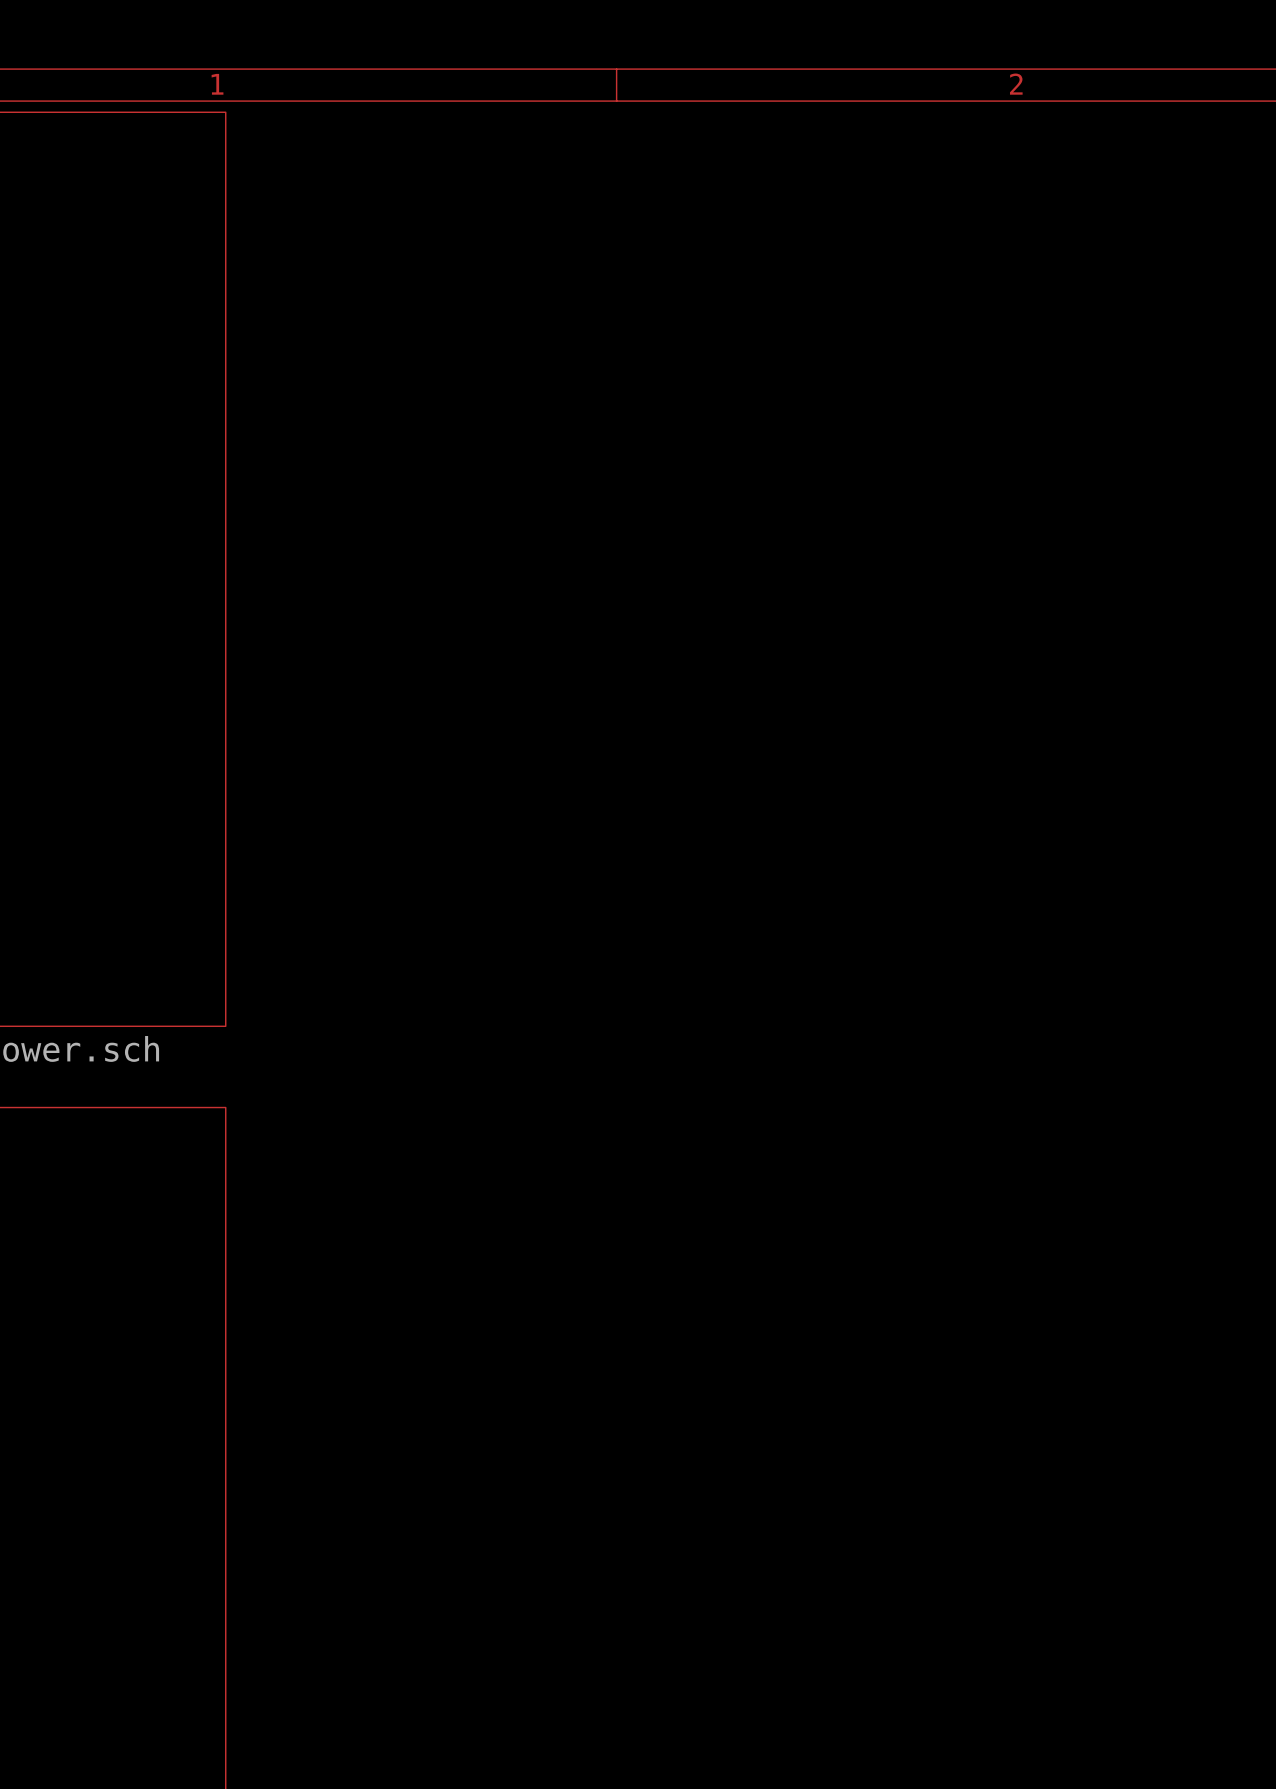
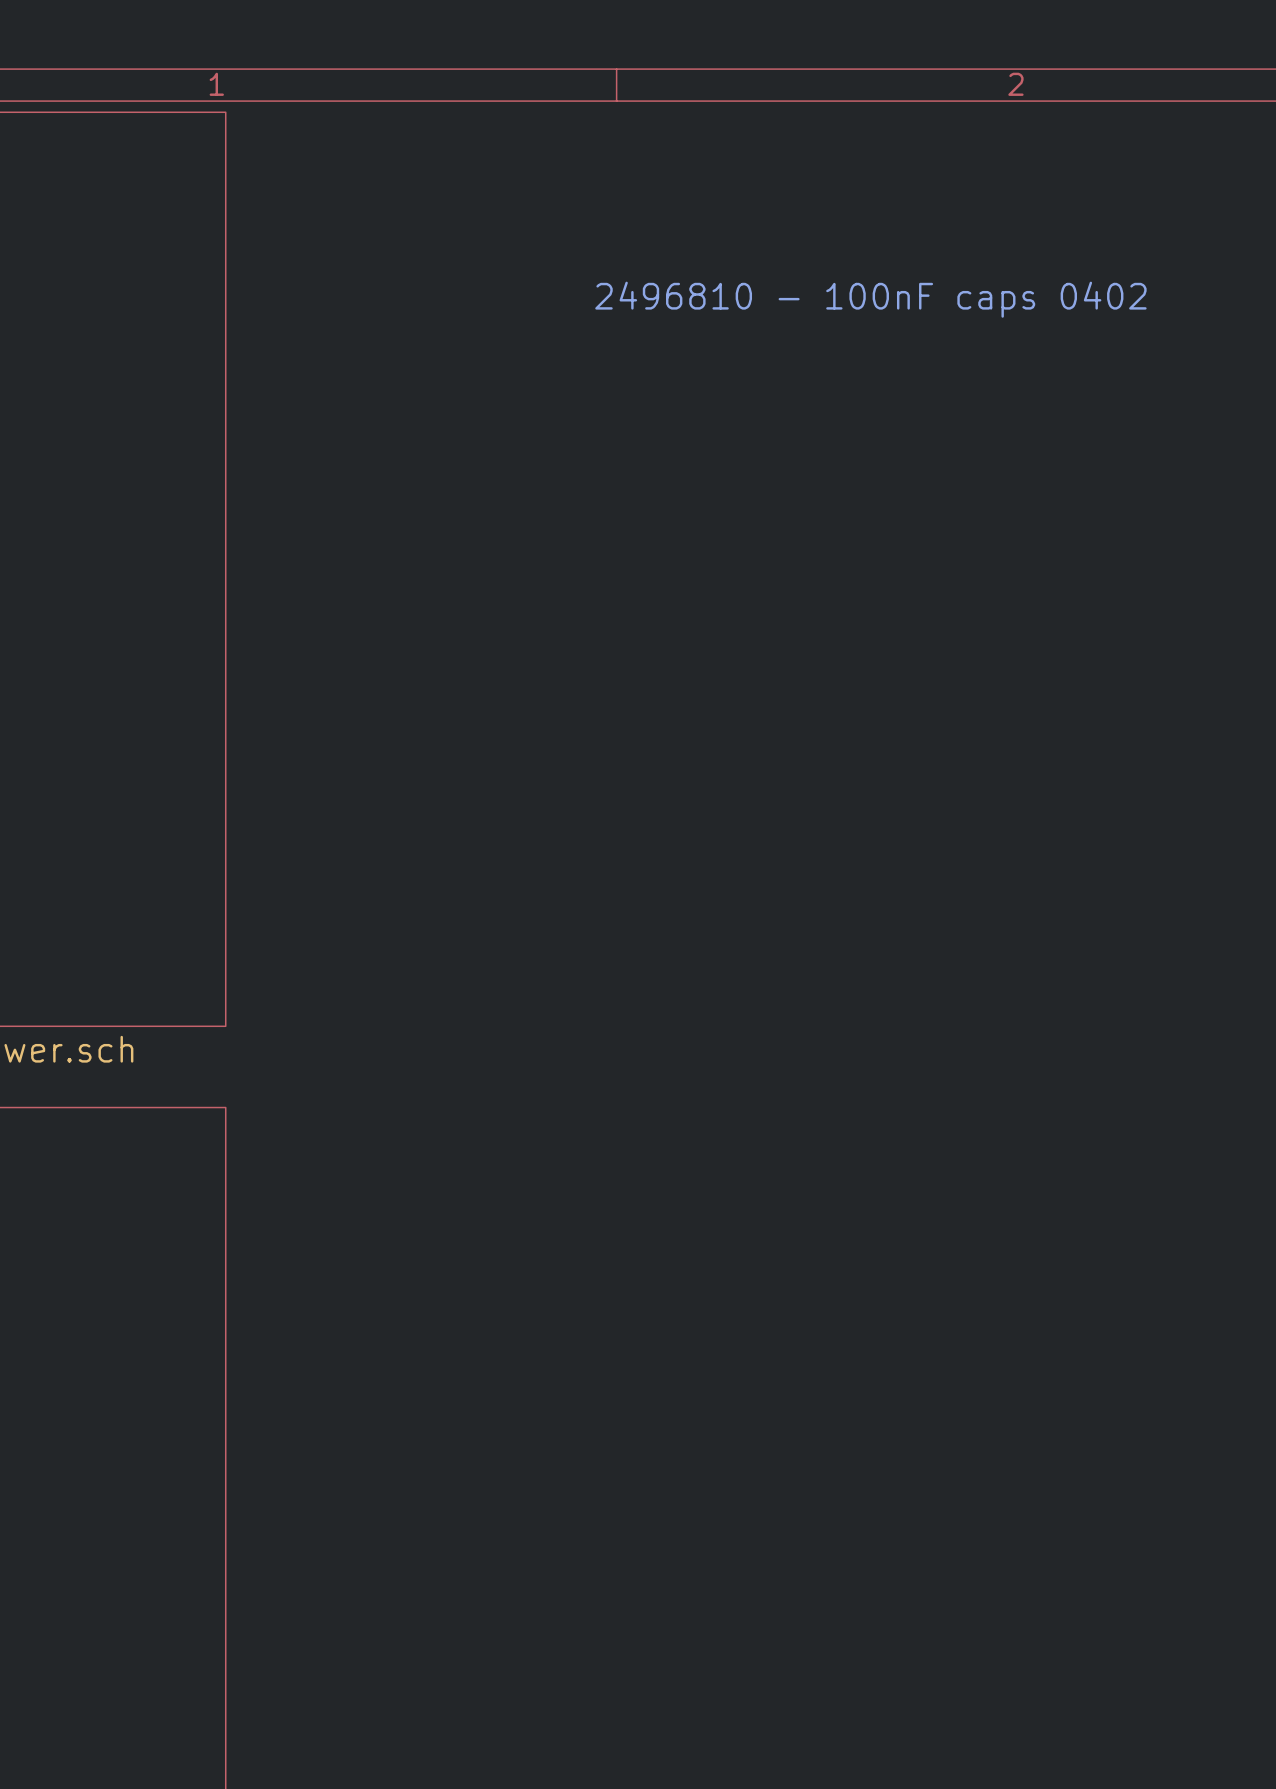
text: none -> 2496810 - 100nF caps 0402 (870, 299)

